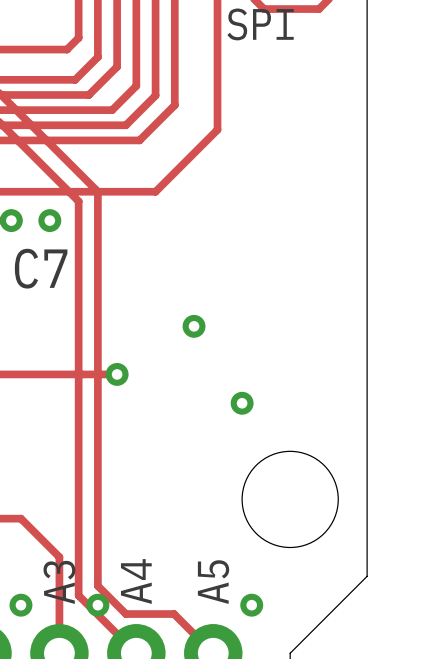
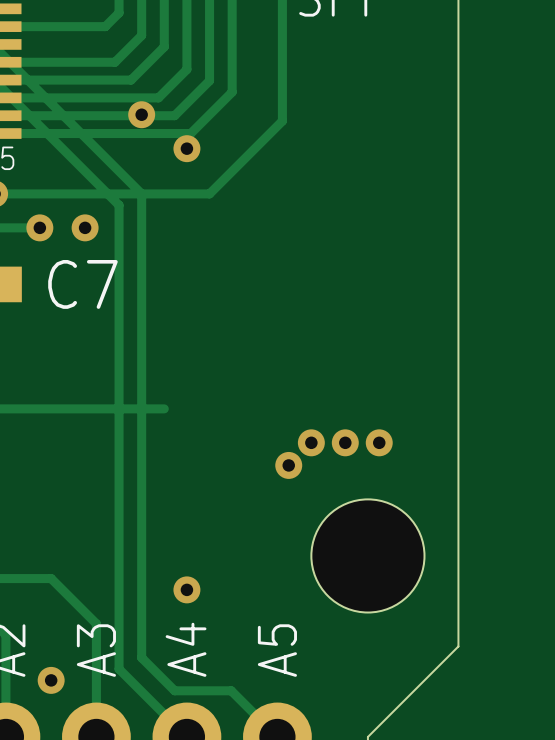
via: none -> (141, 114)
via: none -> (186, 148)
via: (194, 326) -> none
via: (117, 374) -> none
via: none -> (345, 442)
via: none -> (379, 442)
via: none -> (288, 465)
via: none -> (186, 589)
via: (97, 605) -> none
via: (251, 605) -> none

